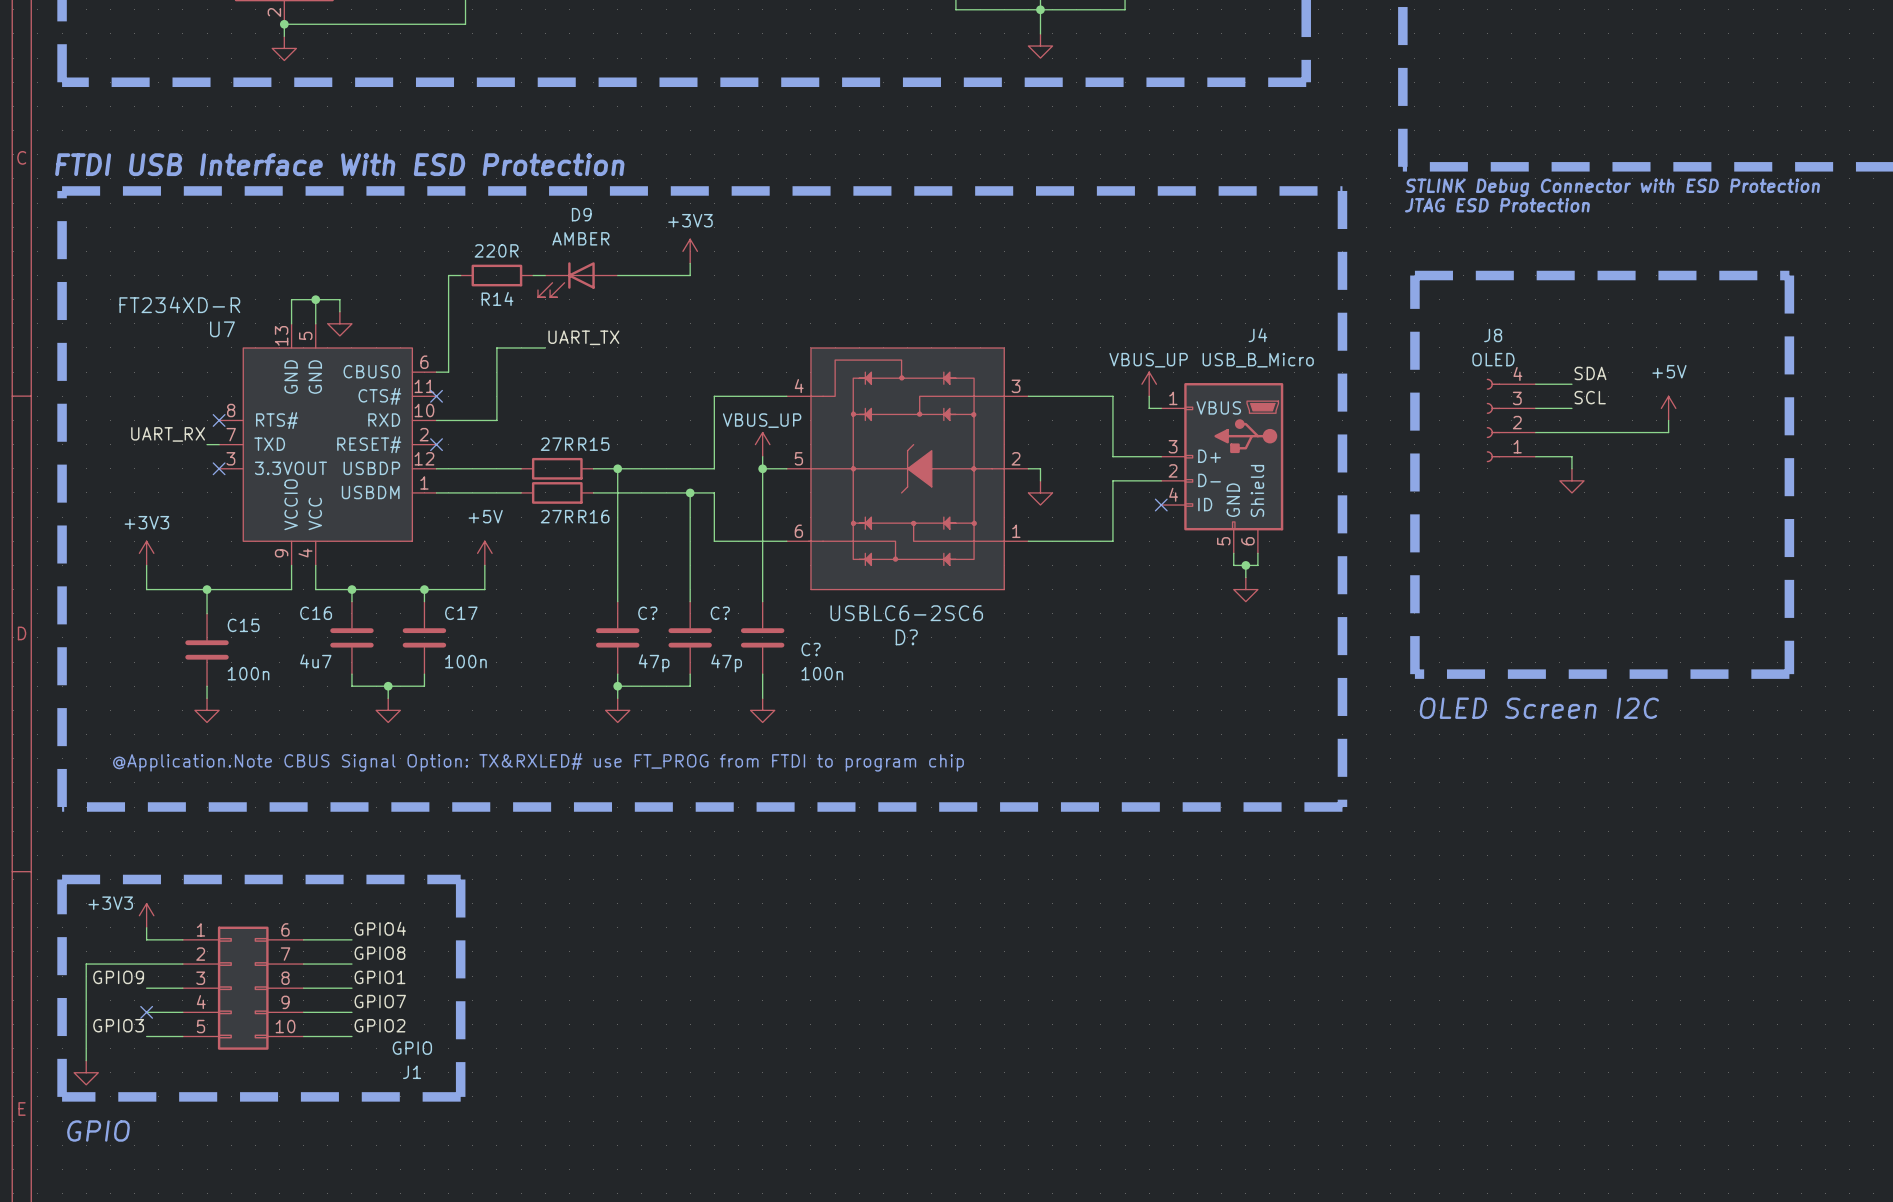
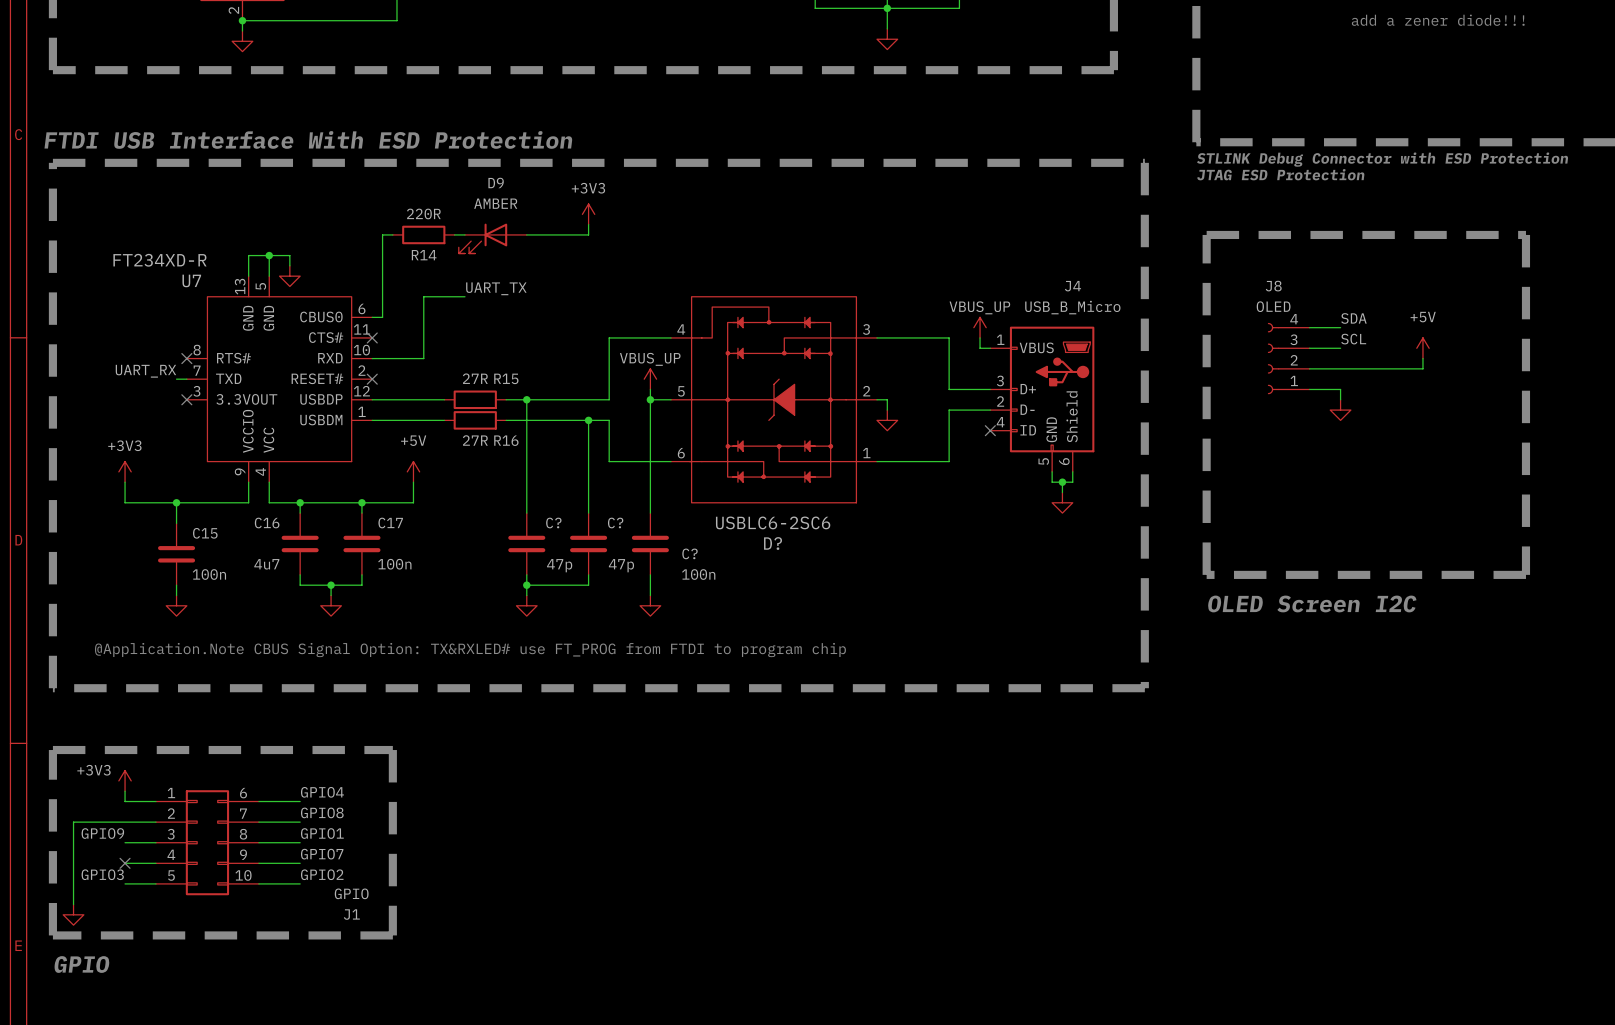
text: none -> add a zener diode!!! (1438, 20)

